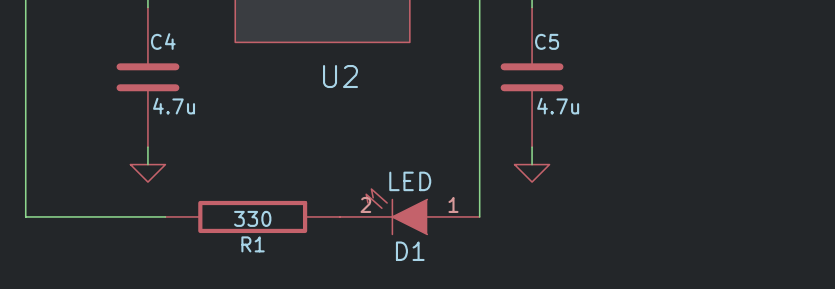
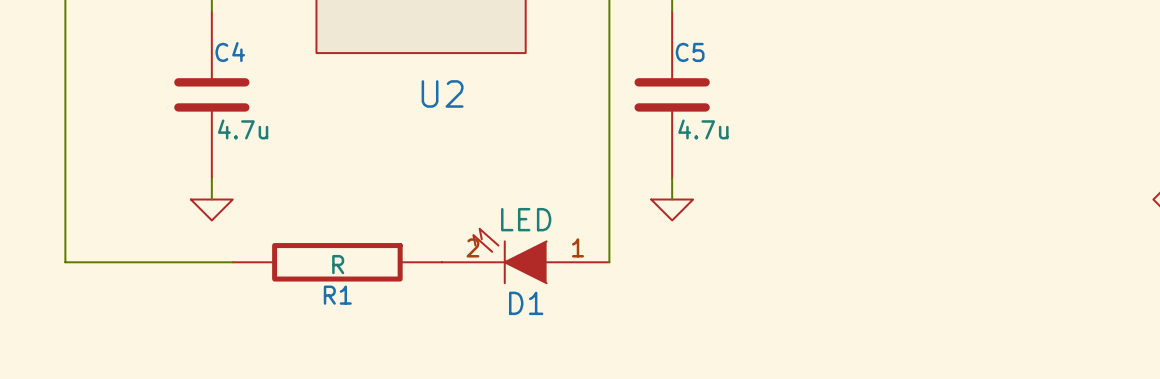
R1 value: 330 (252, 218) -> R (338, 264)

